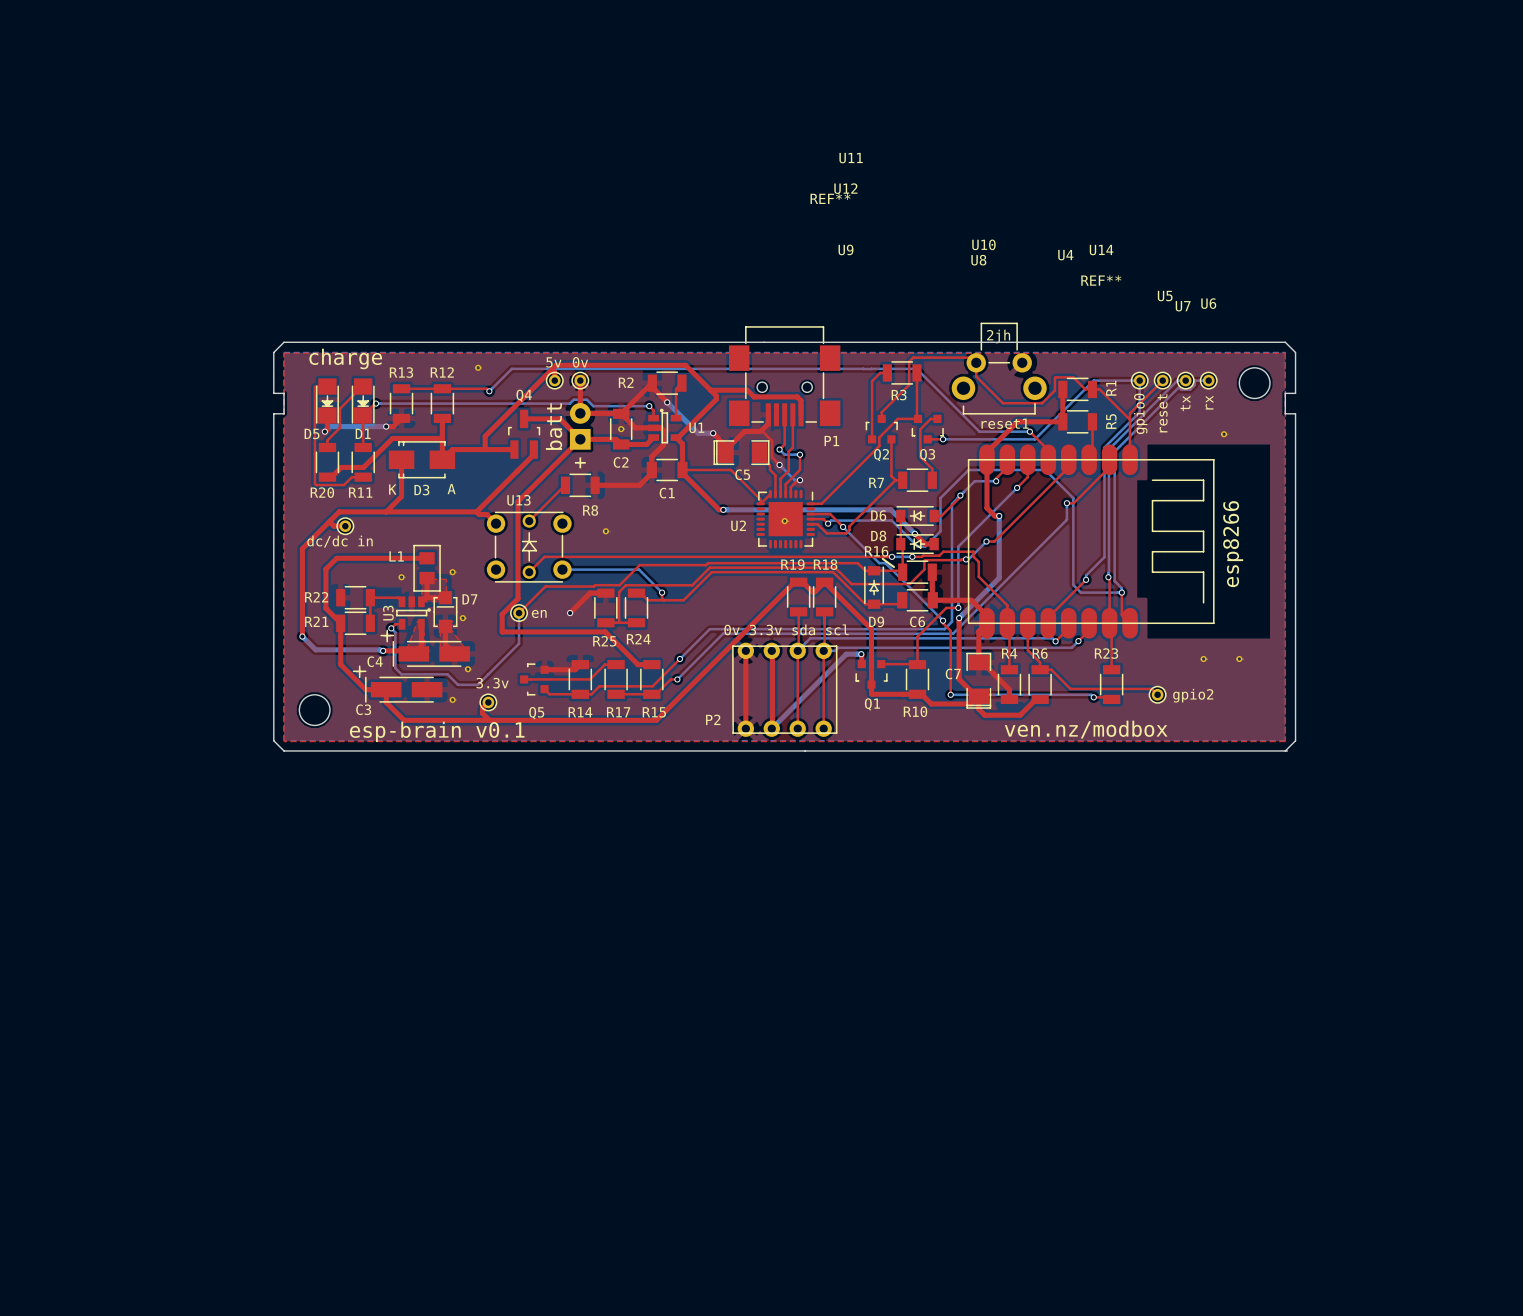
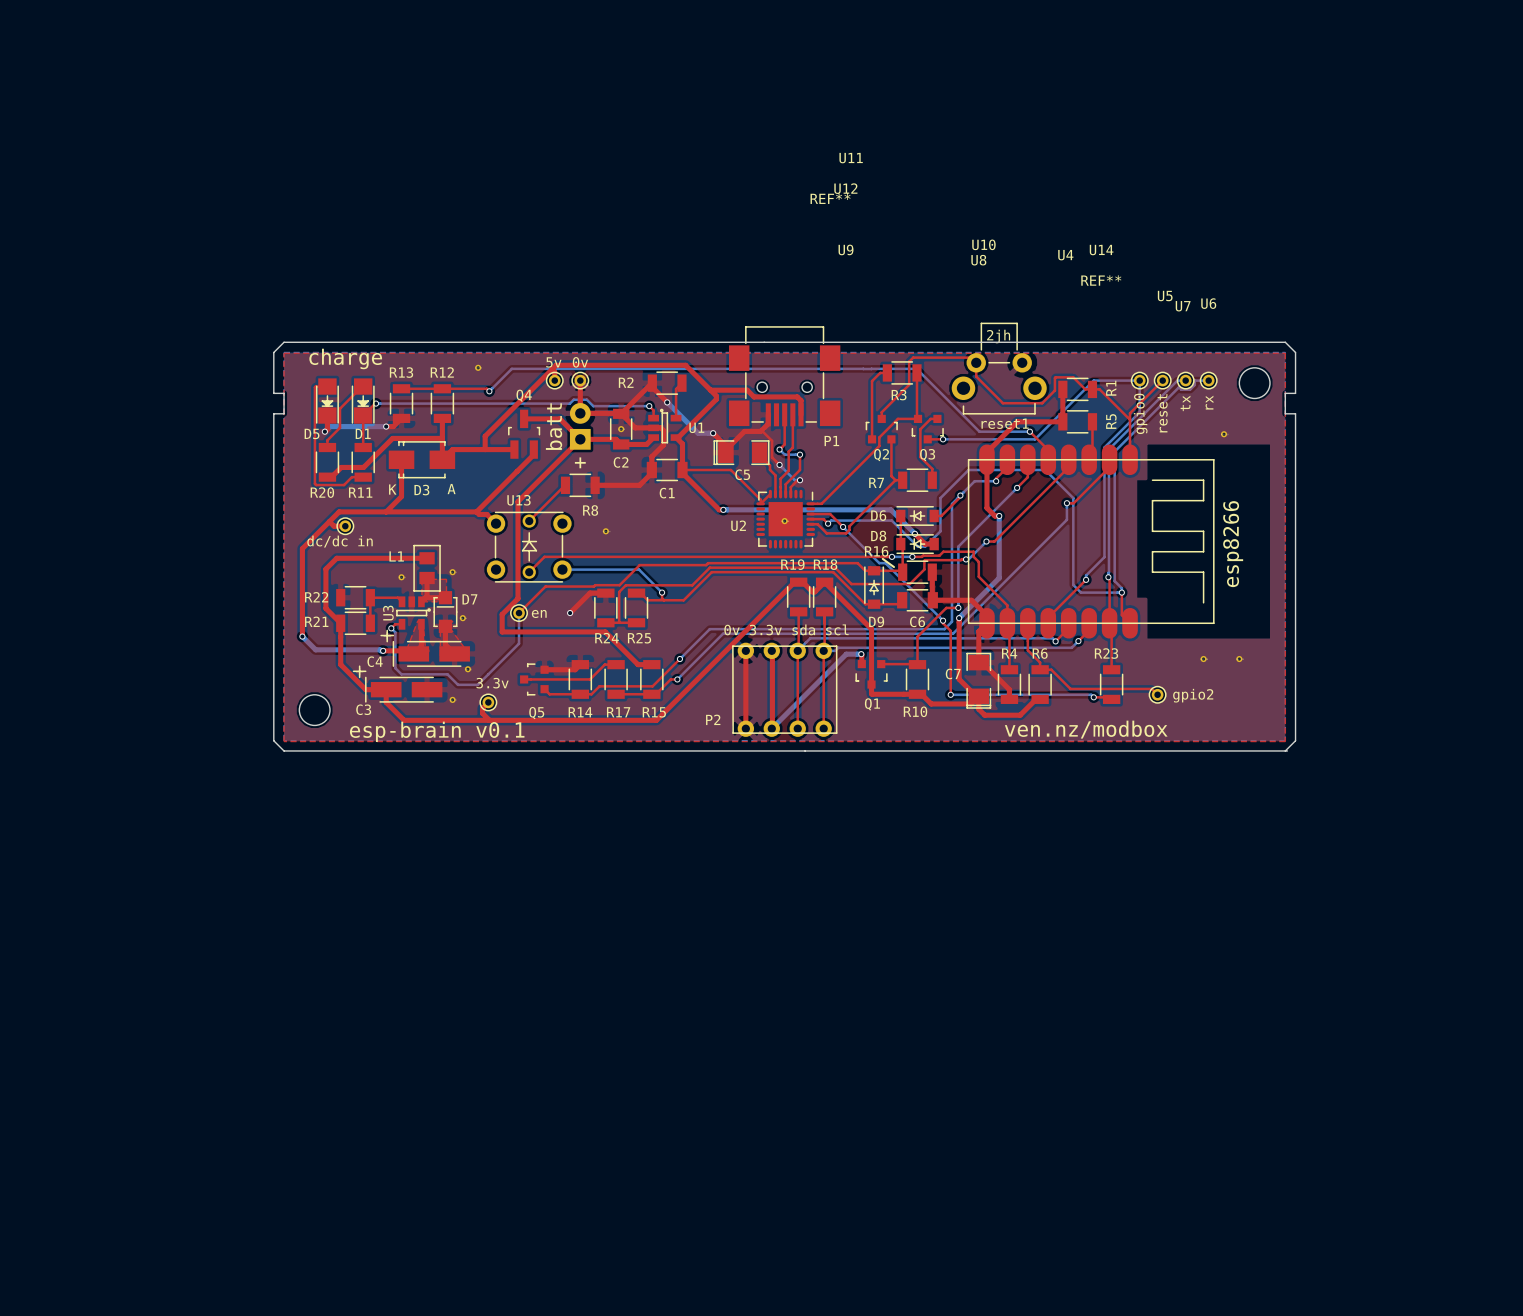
R24 name position: R24 (638, 639) -> R24 (607, 638)
R25 name position: R25 (604, 641) -> R25 (639, 638)

